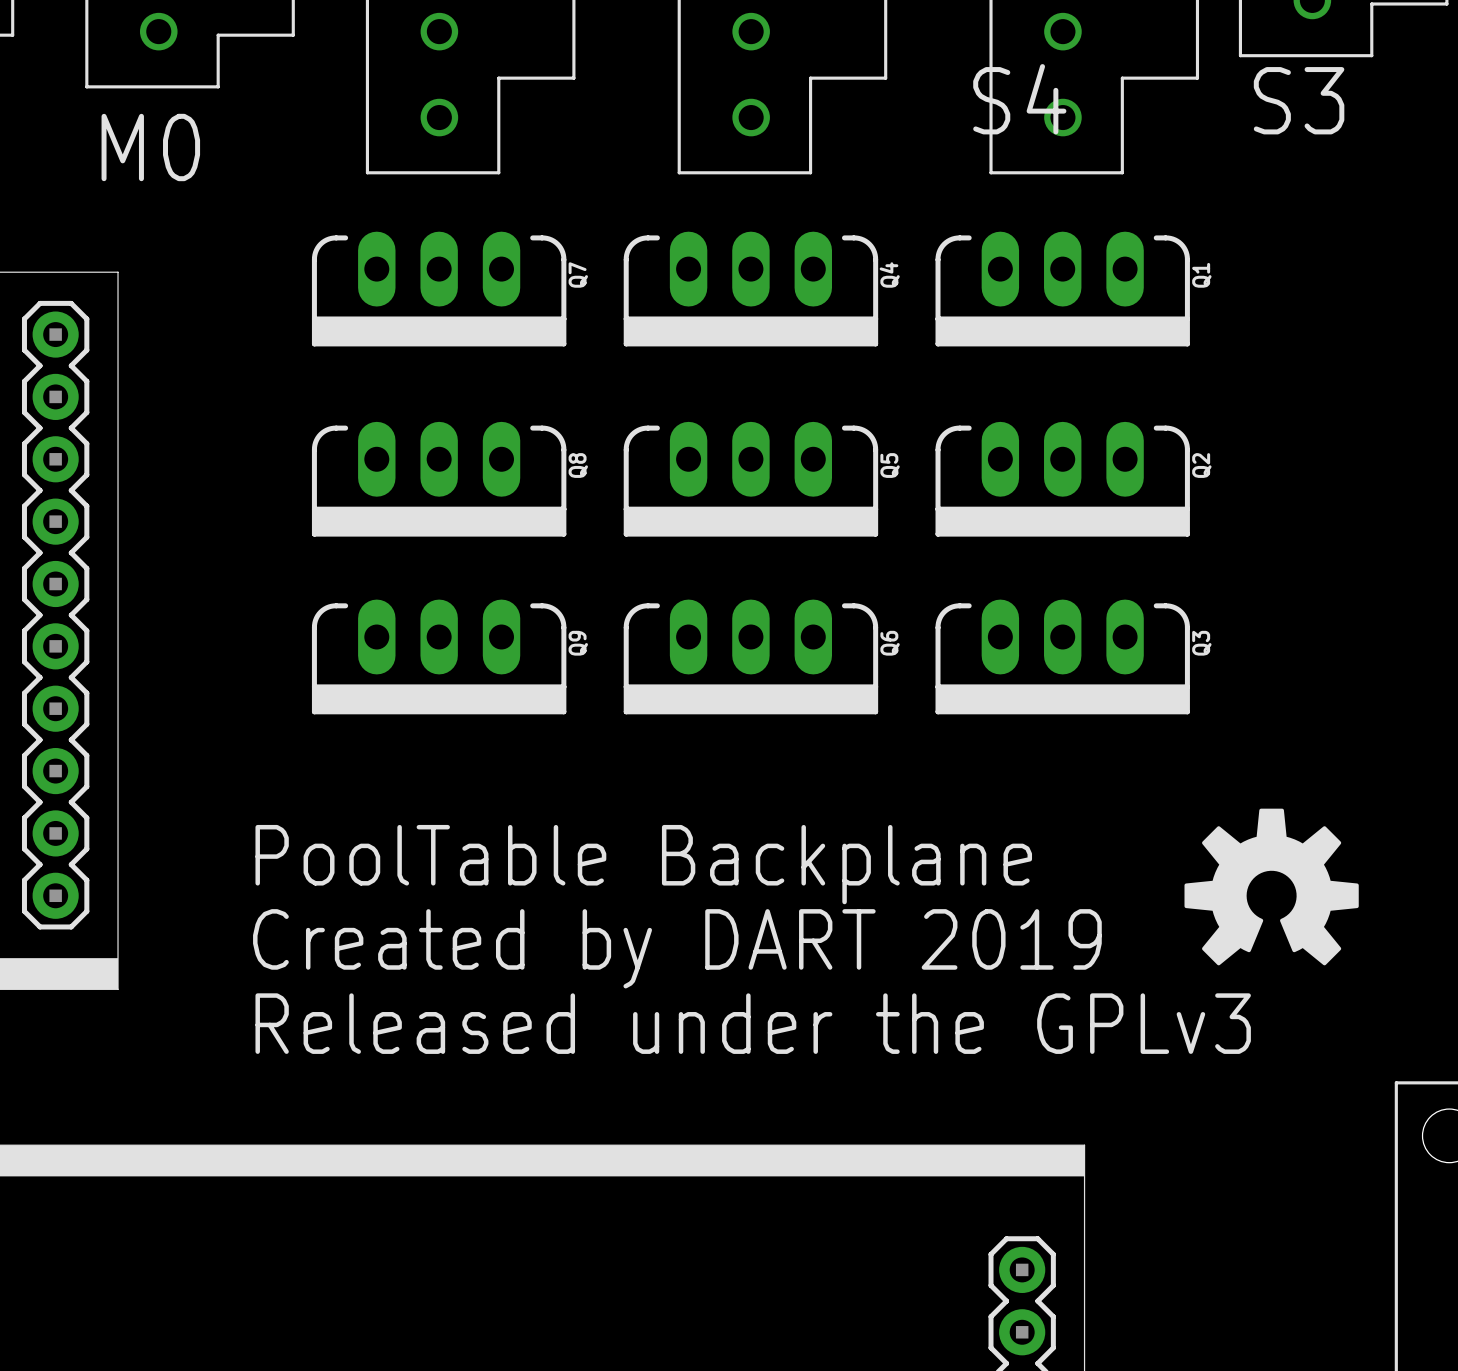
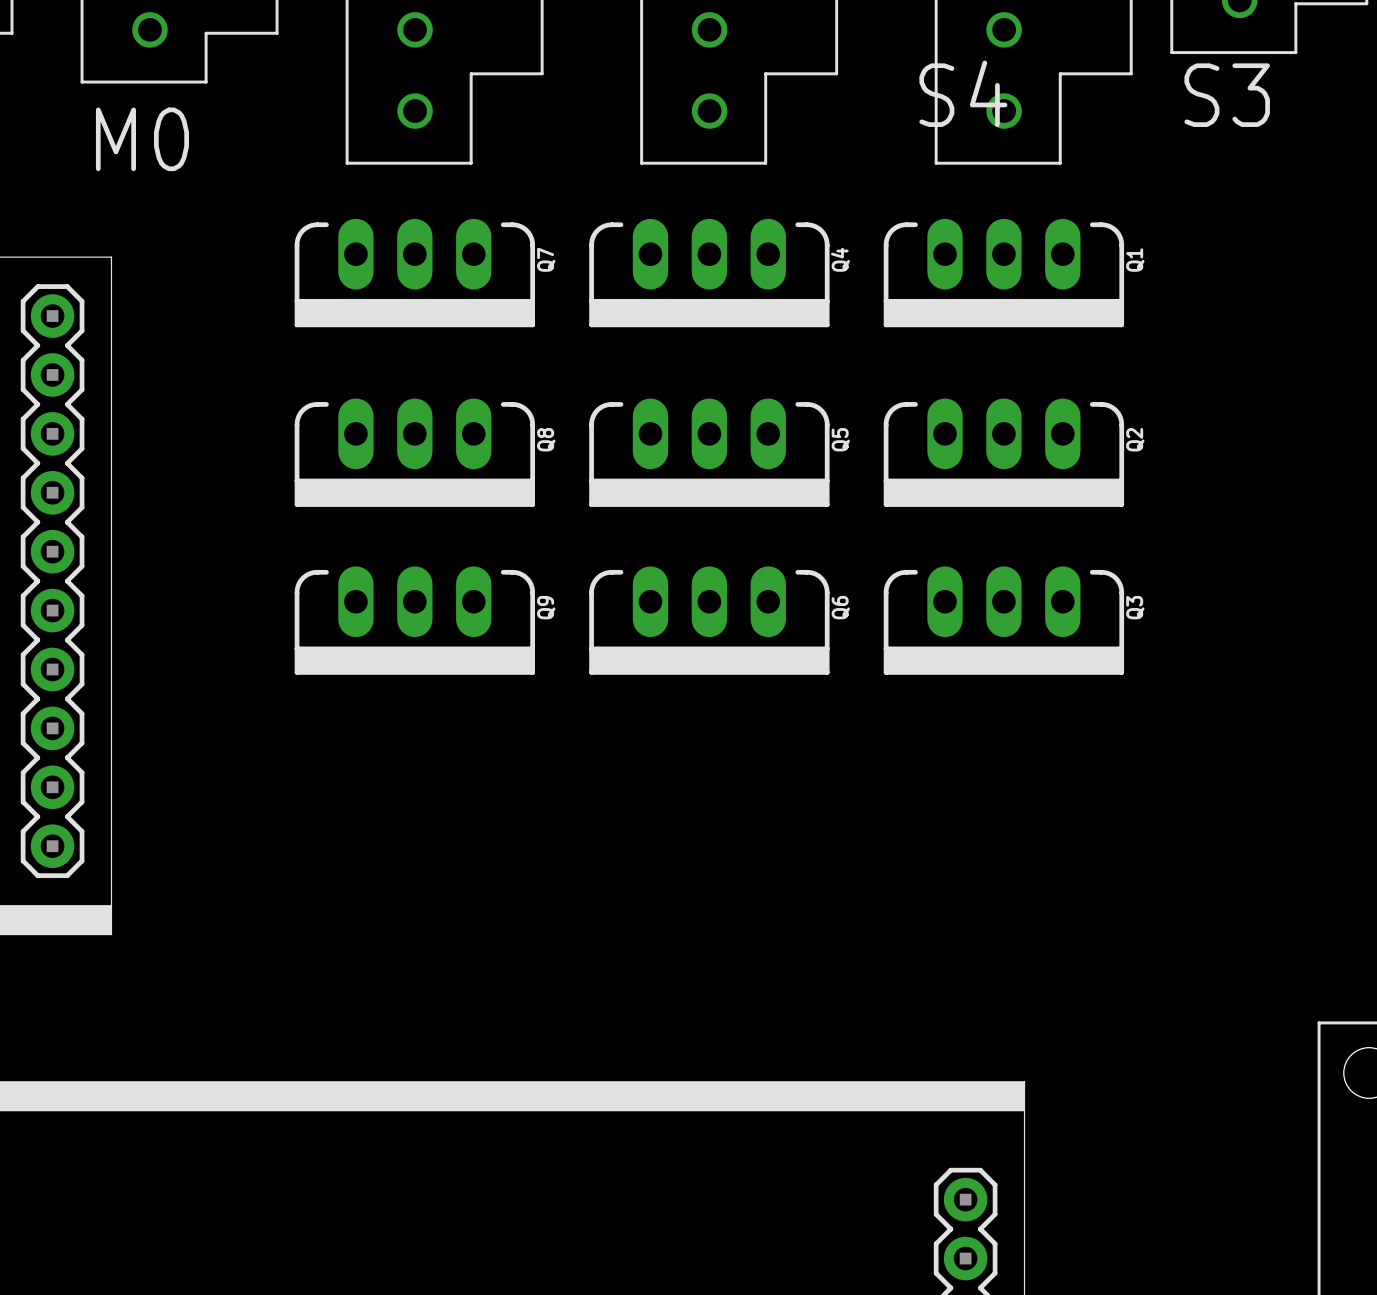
drawing: [1184, 808, 1359, 966] -> none
text: PoolTable Backplane (643, 864) -> none
text: Created by DART 2019 (677, 948) -> none
text: Released under the GPLv3 (753, 1023) -> none

